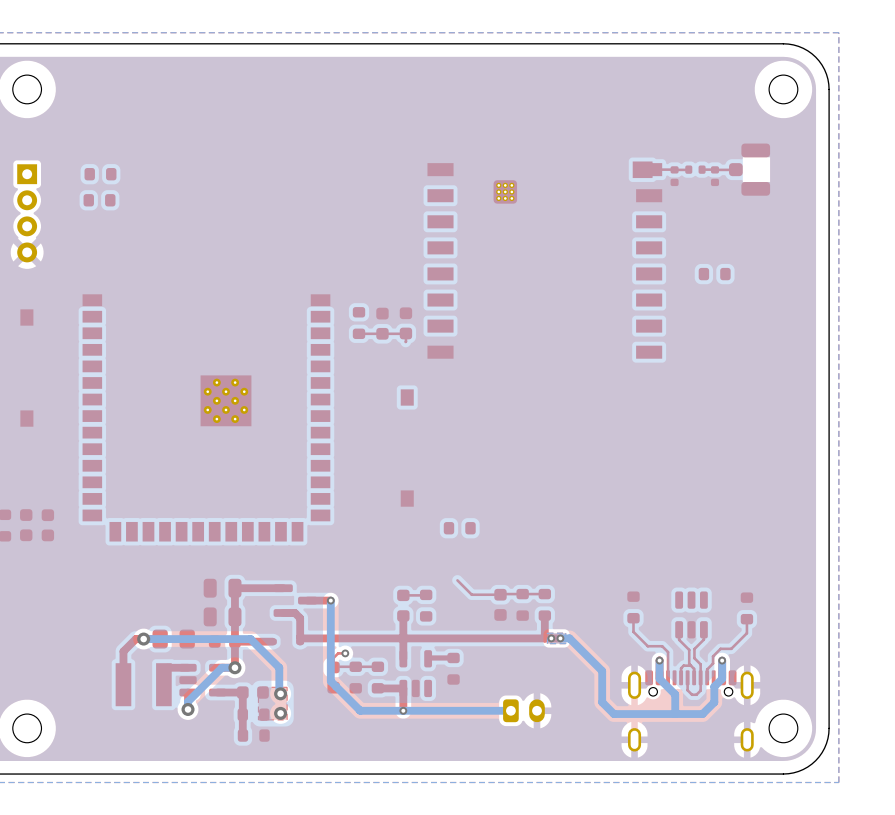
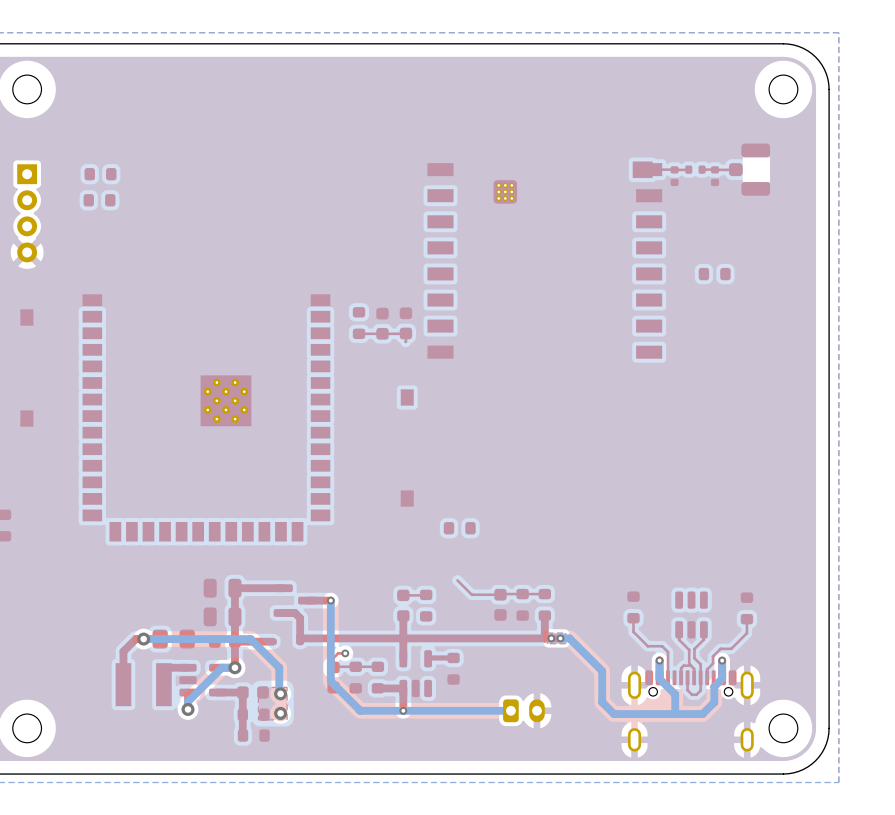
part: (26, 525) -> none
part: (47, 525) -> none

